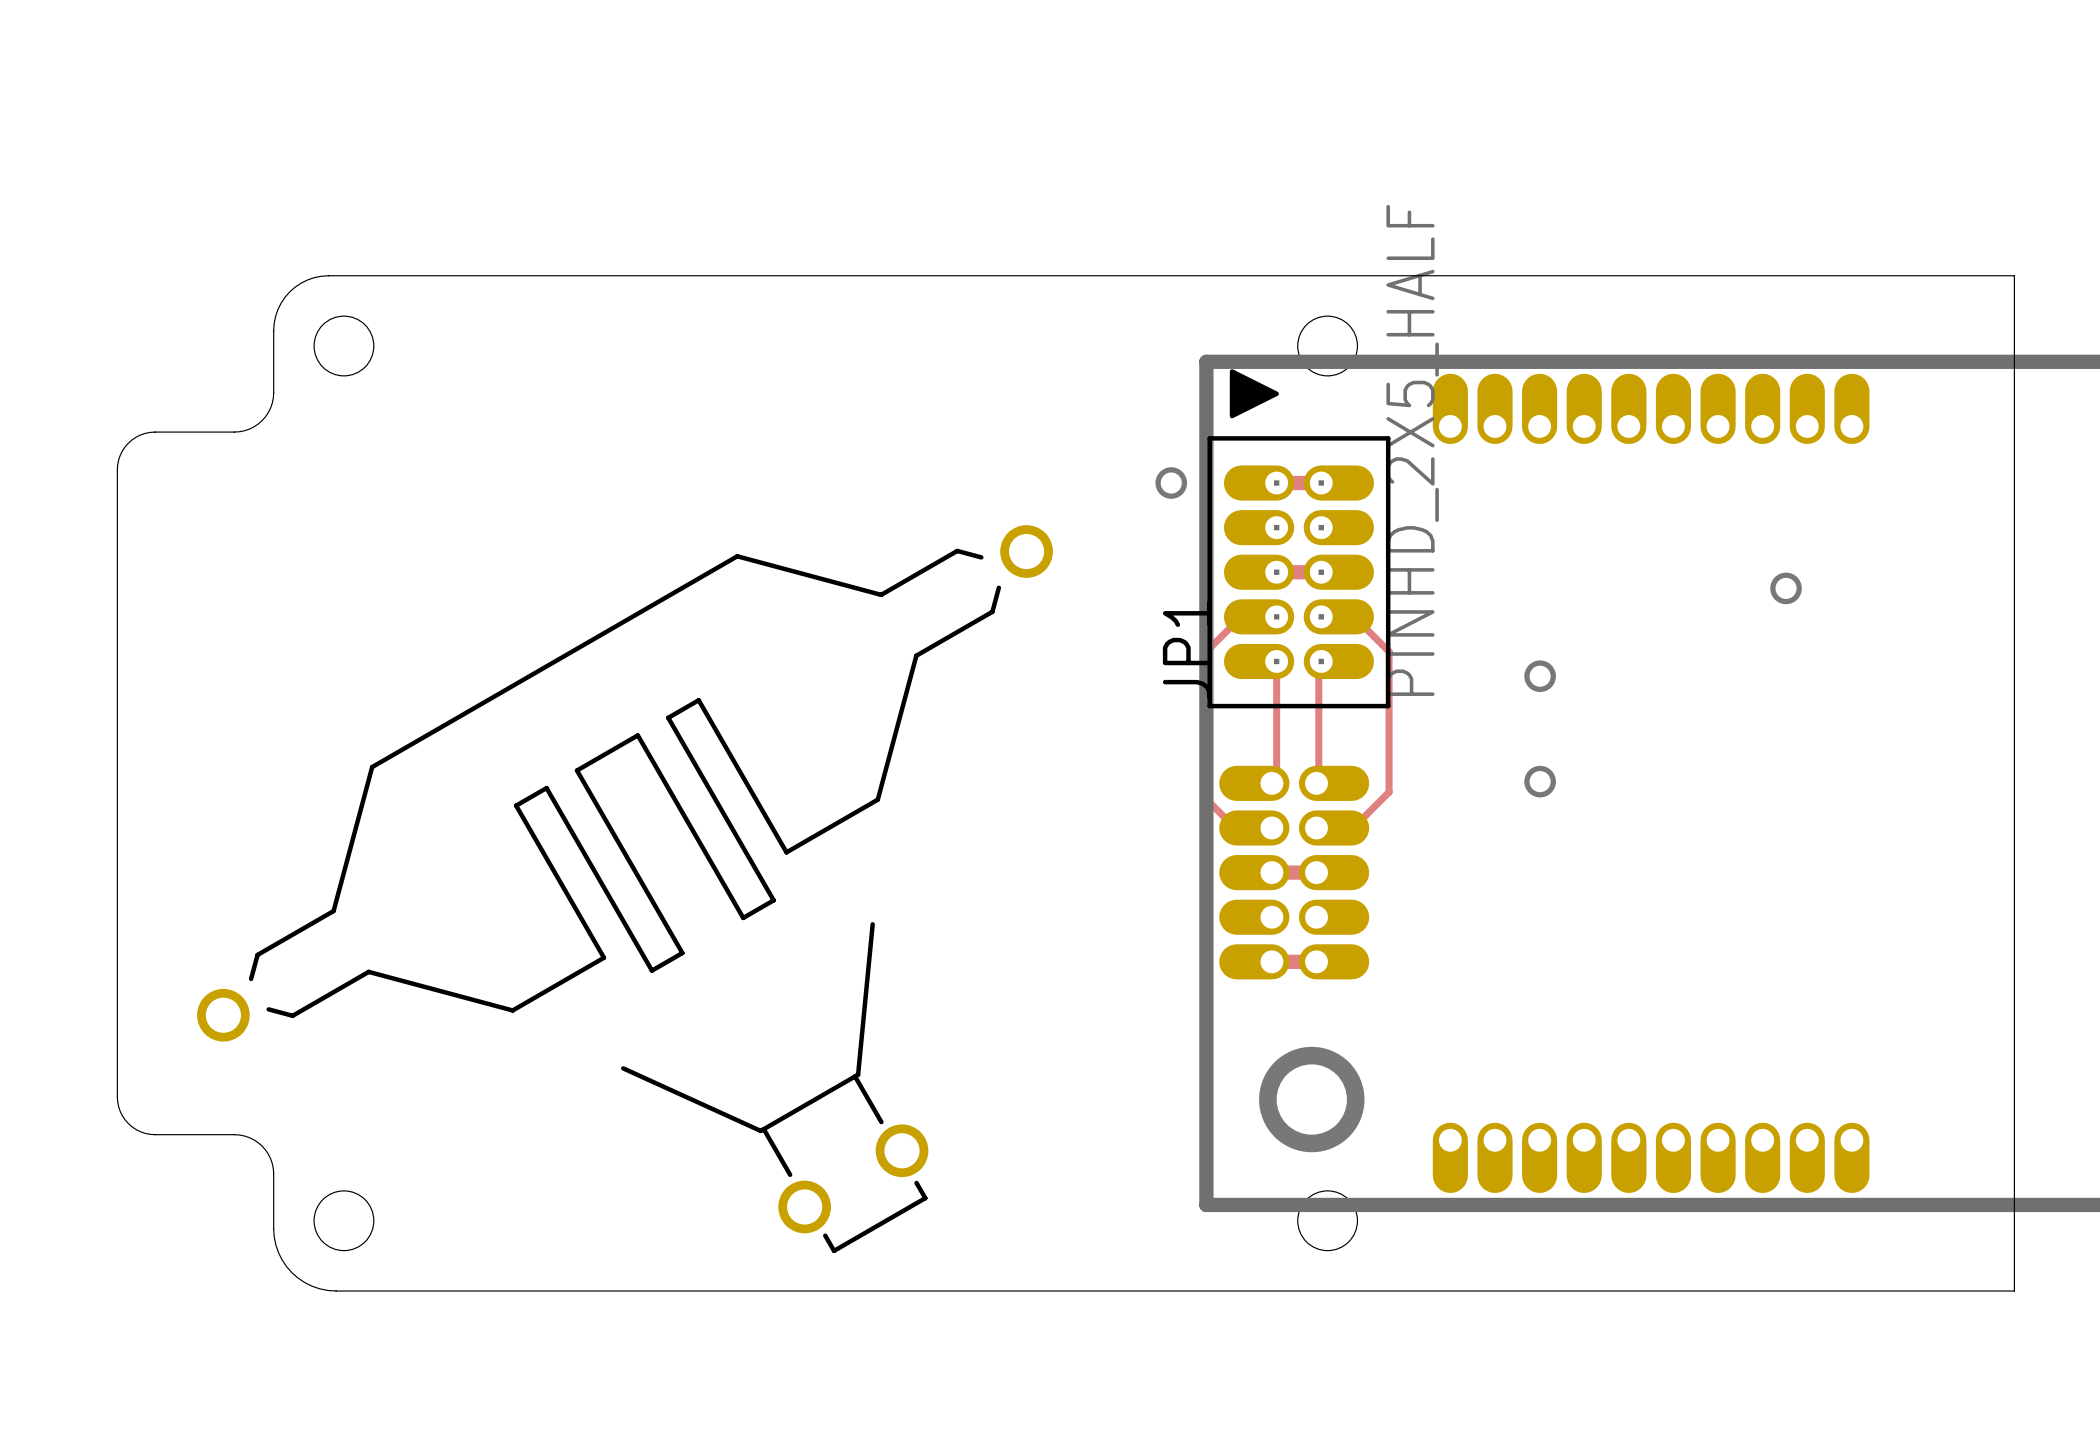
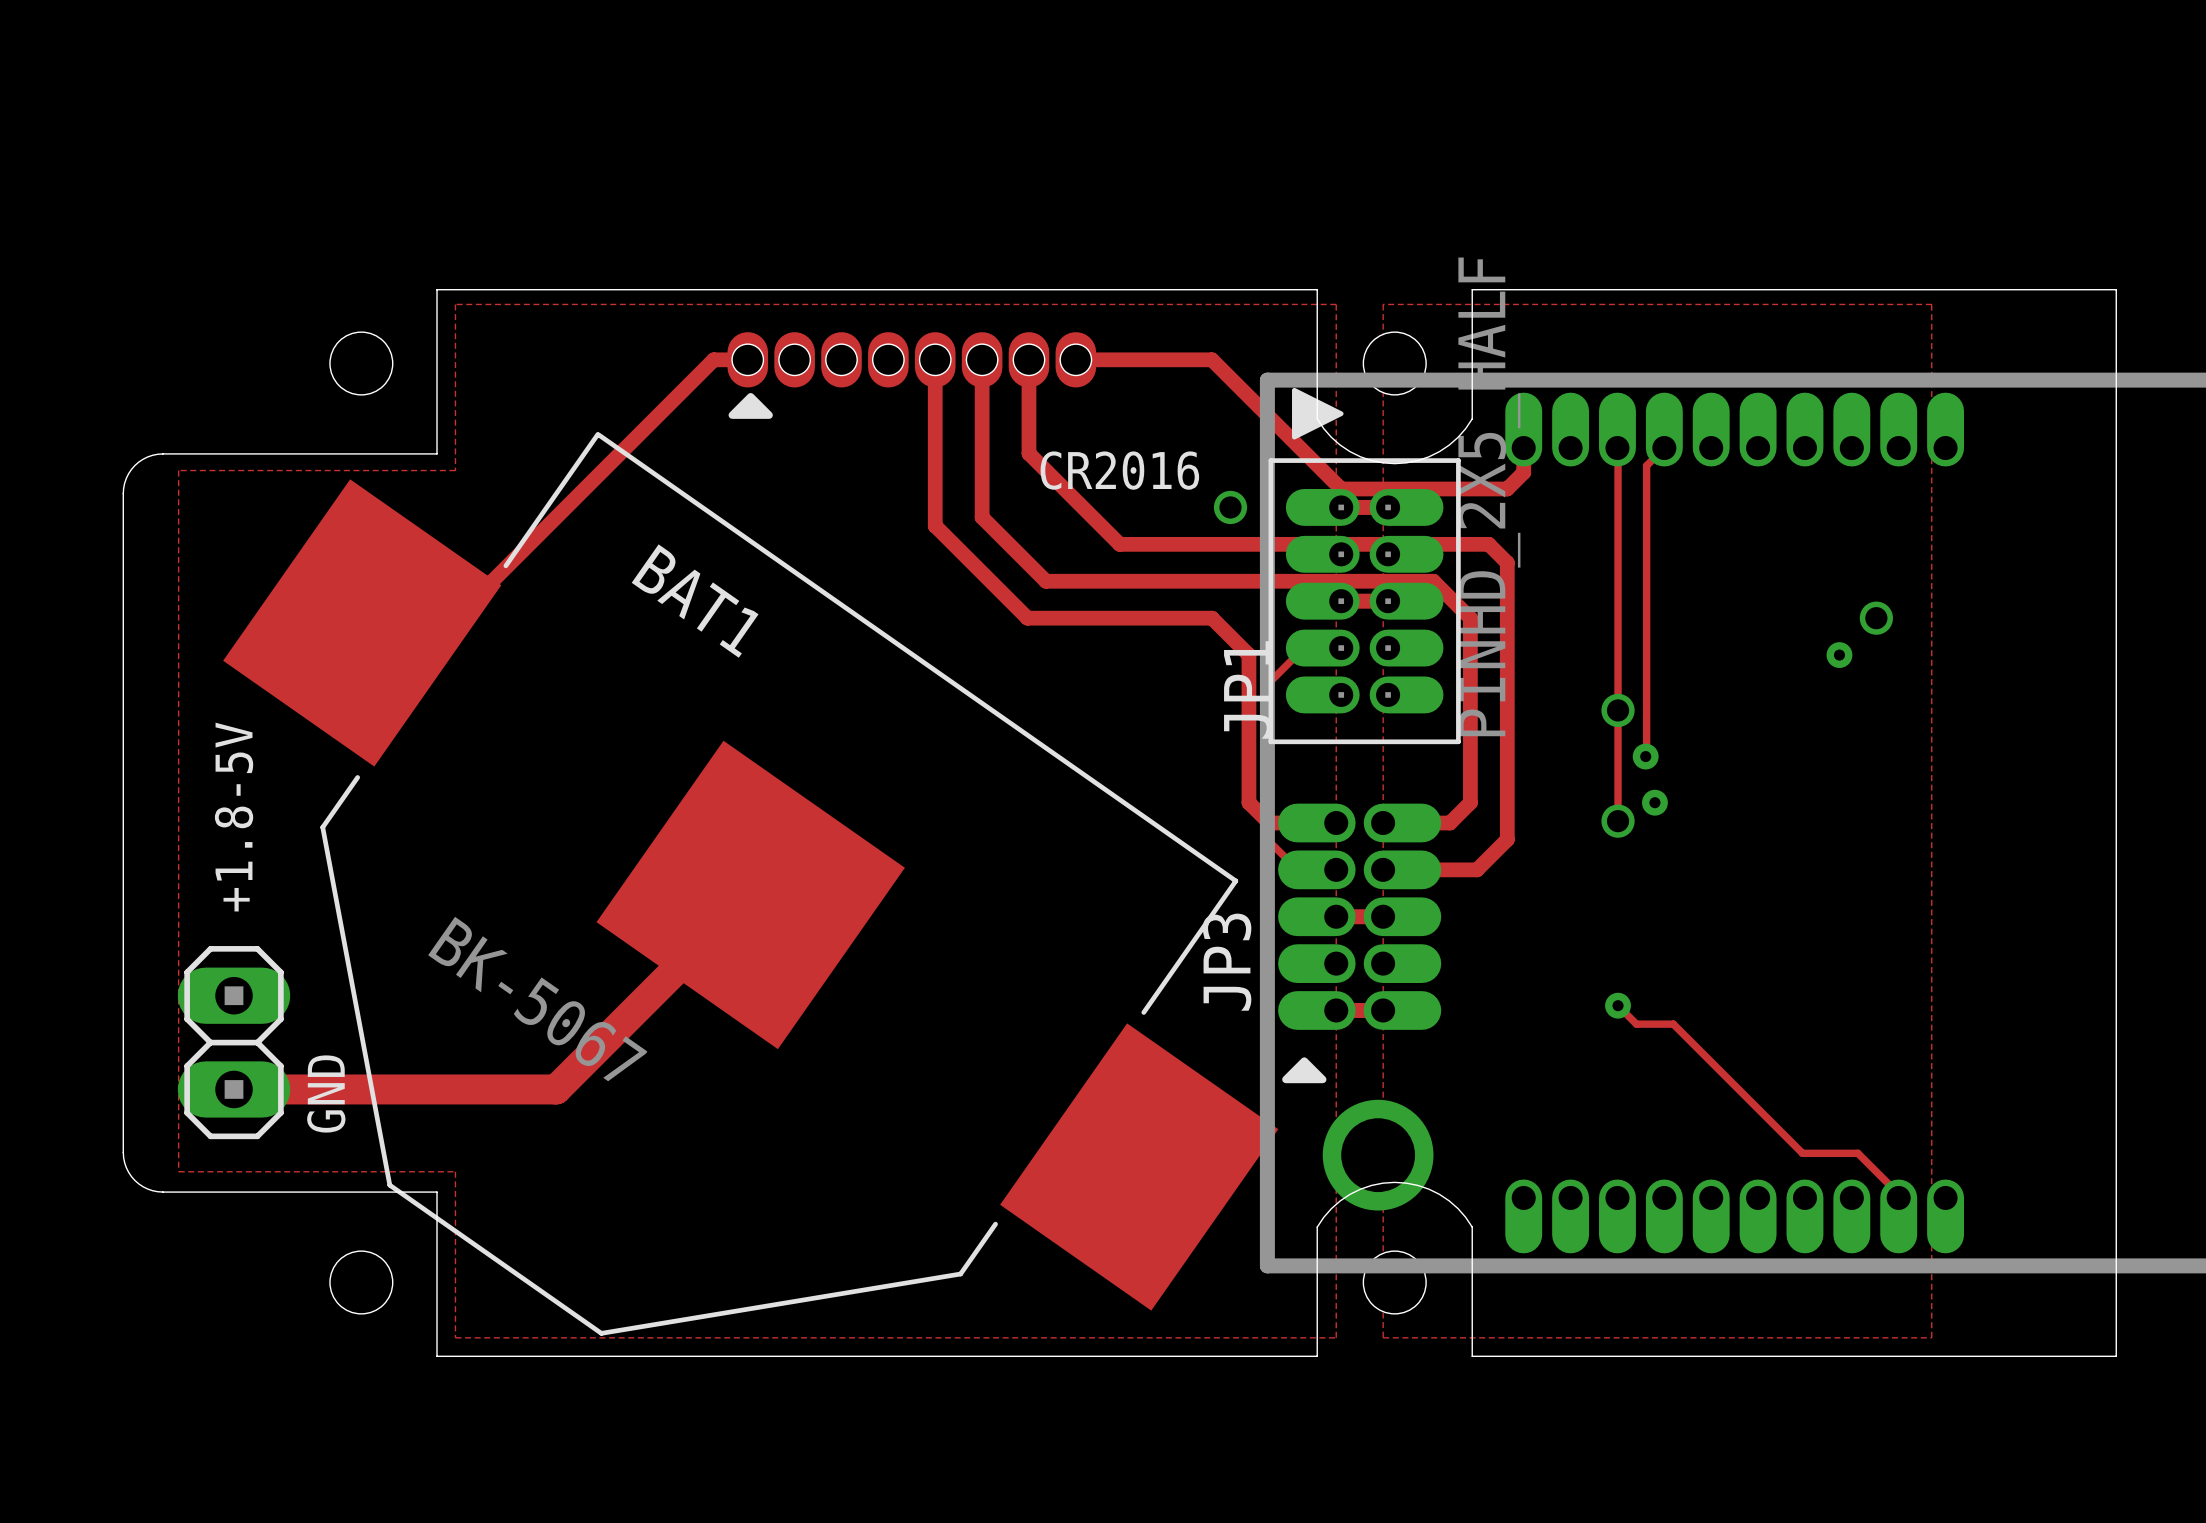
board edge: (415, 275) (321, 276) (307, 279) (295, 287) (281, 303) (275, 316) (273, 330) (273, 392) (270, 407) (258, 423) (249, 429) (234, 432) -> (437, 289) (437, 453) (246, 453)
board edge: (1253, 275) (1401, 275) -> (1317, 289) (1317, 418) (1331, 437) (1349, 451) (1371, 460) (1394, 463) (1417, 460) (1439, 451) (1458, 437) (1472, 418) (1472, 289)
zone outline: none -> (455, 304) (455, 470) (178, 470) (178, 1171) (455, 1171) (455, 1337) (1336, 1337) (1336, 304) (455, 304)
zone outline: none -> (1383, 304) (1931, 304) (1931, 1337) (1383, 1337) (1383, 304)
track: none -> (747, 359) (713, 359) (450, 622) (362, 622)
part: none -> (911, 359)
track: none -> (1075, 359) (1212, 359) (1341, 488) (1507, 488) (1523, 472) (1523, 448)
drawing: none -> [728, 393, 773, 419]
track: none -> (1617, 448) (1618, 821)
track: none -> (1664, 448) (1646, 465) (1646, 755)
text: none -> CR2016 (1119, 470)
track: (1321, 616) (1325, 623) (1360, 623) (1389, 651) (1389, 792) (1353, 827) (1316, 827) -> (1028, 359) (1028, 453) (1119, 544) (1488, 544) (1507, 562) (1507, 839) (1477, 869) (1383, 869)
via: none -> (1839, 655)
track: (1276, 661) (1276, 778) (1271, 783) -> (935, 359) (935, 525) (1027, 618) (1212, 618) (1248, 655) (1248, 802) (1269, 823) (1336, 823)
track: (1321, 661) (1318, 665) (1318, 778) (1316, 783) -> (982, 359) (982, 517) (1045, 581) (1433, 581) (1470, 618) (1470, 802) (1450, 823) (1383, 823)
via: none -> (1645, 756)
text: none -> +1.8-5V (234, 817)
via: none -> (1654, 802)
BAT1: none -> BK-5067 (750, 883)
track: none -> (750, 894) (556, 1089) (234, 1089)
part: (1294, 872) -> none
JP3: none -> (1359, 916)
part: (624, 889) -> none
track: none -> (1618, 1005) (1636, 1024) (1673, 1024) (1802, 1153) (1857, 1153) (1898, 1194) (1898, 1197)
via: none -> (1618, 1005)
part: none -> (234, 1042)
drawing: none -> [1282, 1057, 1327, 1084]
text: none -> GND (326, 1094)
board edge: (234, 1134) (249, 1137) (258, 1142) (270, 1158) (273, 1173) (273, 1228) (275, 1244) (286, 1266) (298, 1278) (312, 1286) (327, 1290) (415, 1291) -> (246, 1192) (437, 1192) (437, 1356)
board edge: (1253, 1291) (1401, 1291) -> (1317, 1356) (1317, 1227) (1331, 1208) (1349, 1194) (1371, 1185) (1394, 1182) (1417, 1185) (1439, 1194) (1458, 1208) (1472, 1227) (1472, 1356)

